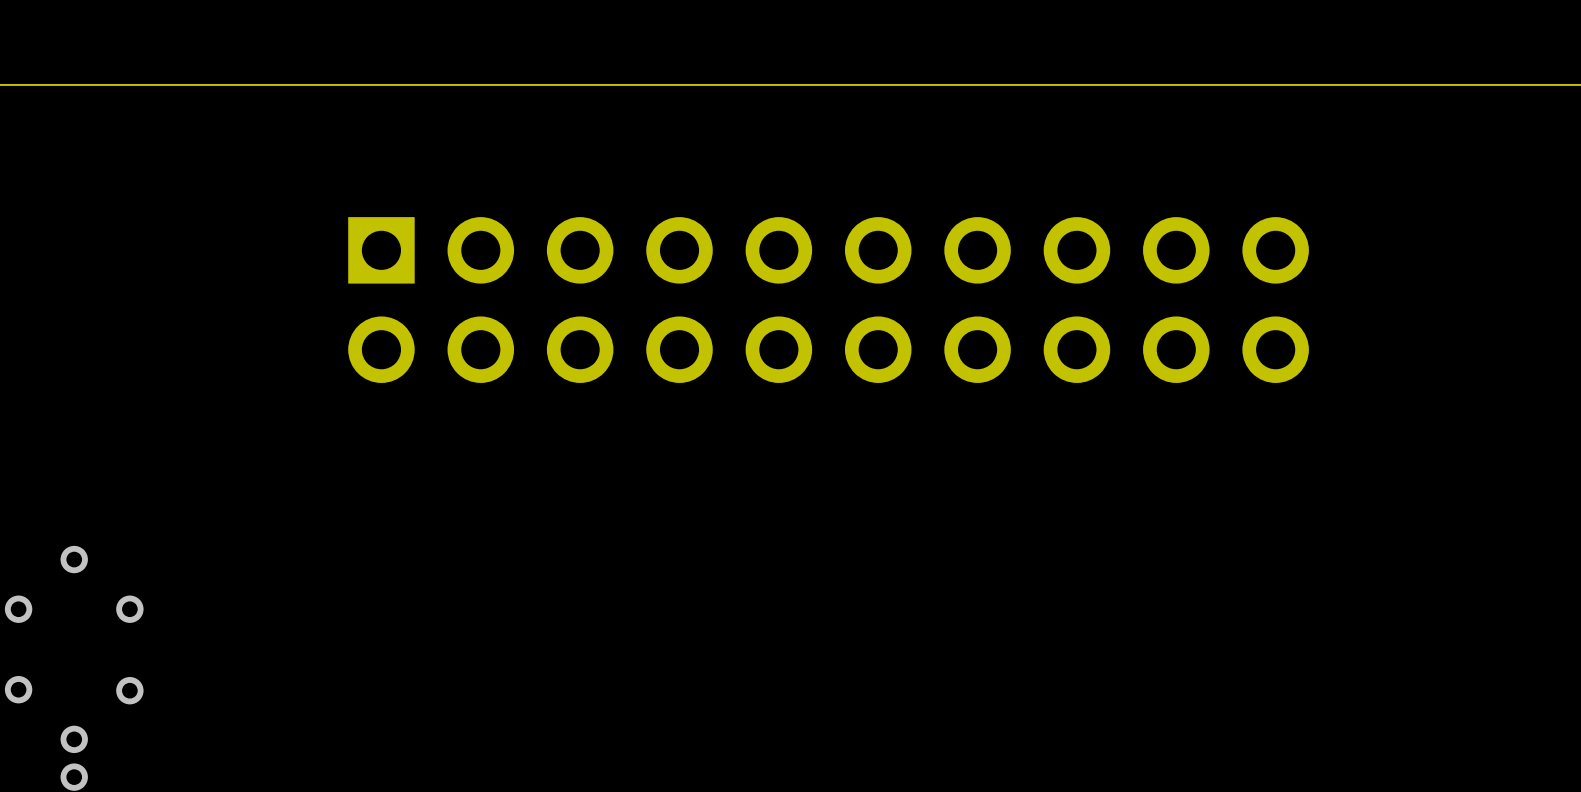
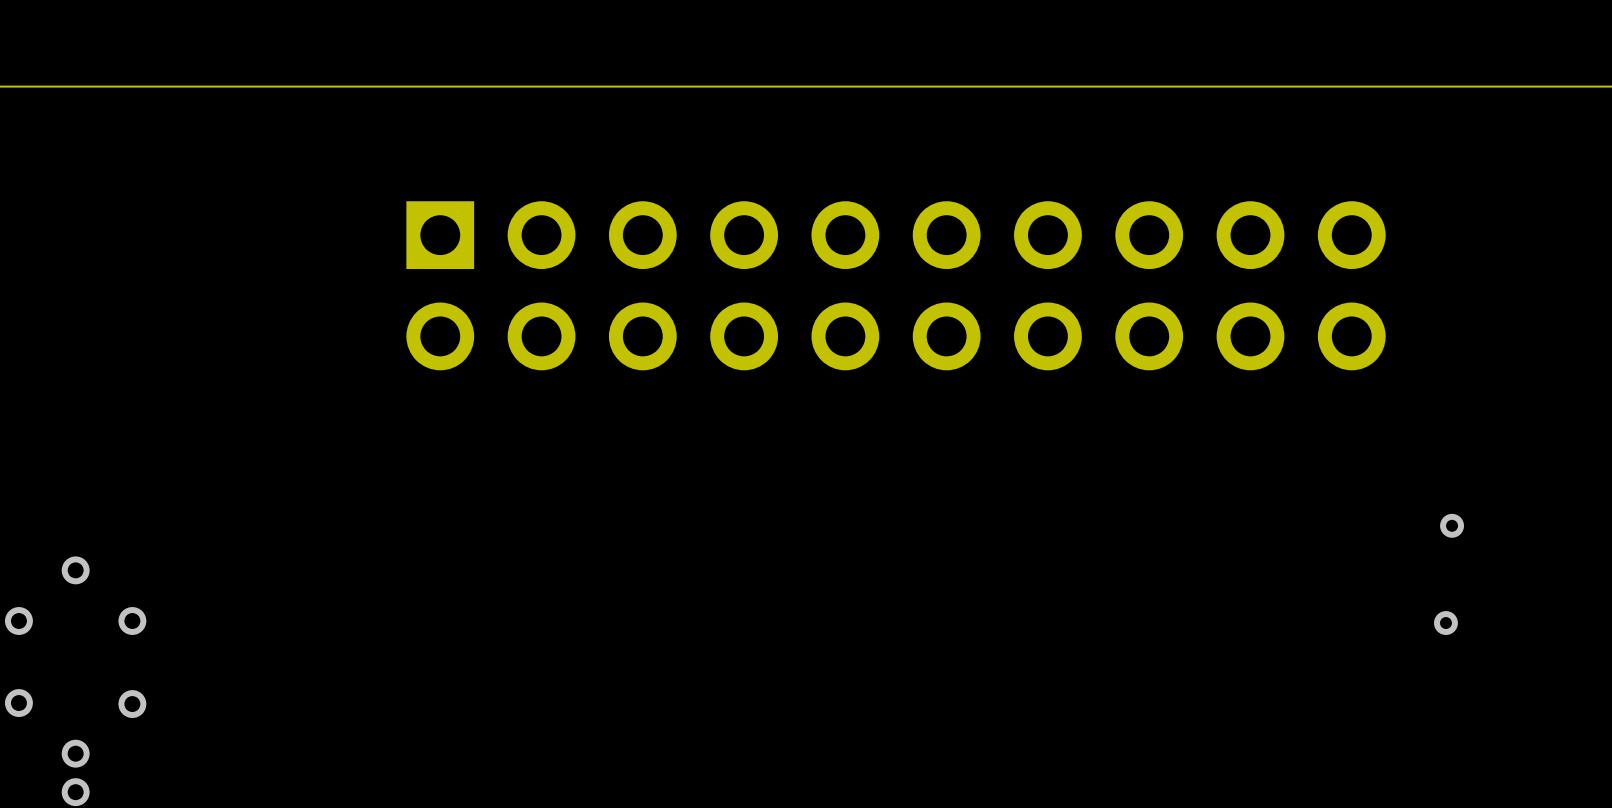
part position: (828, 300) -> (896, 285)
via: none -> (1452, 525)
via: none -> (1445, 623)

